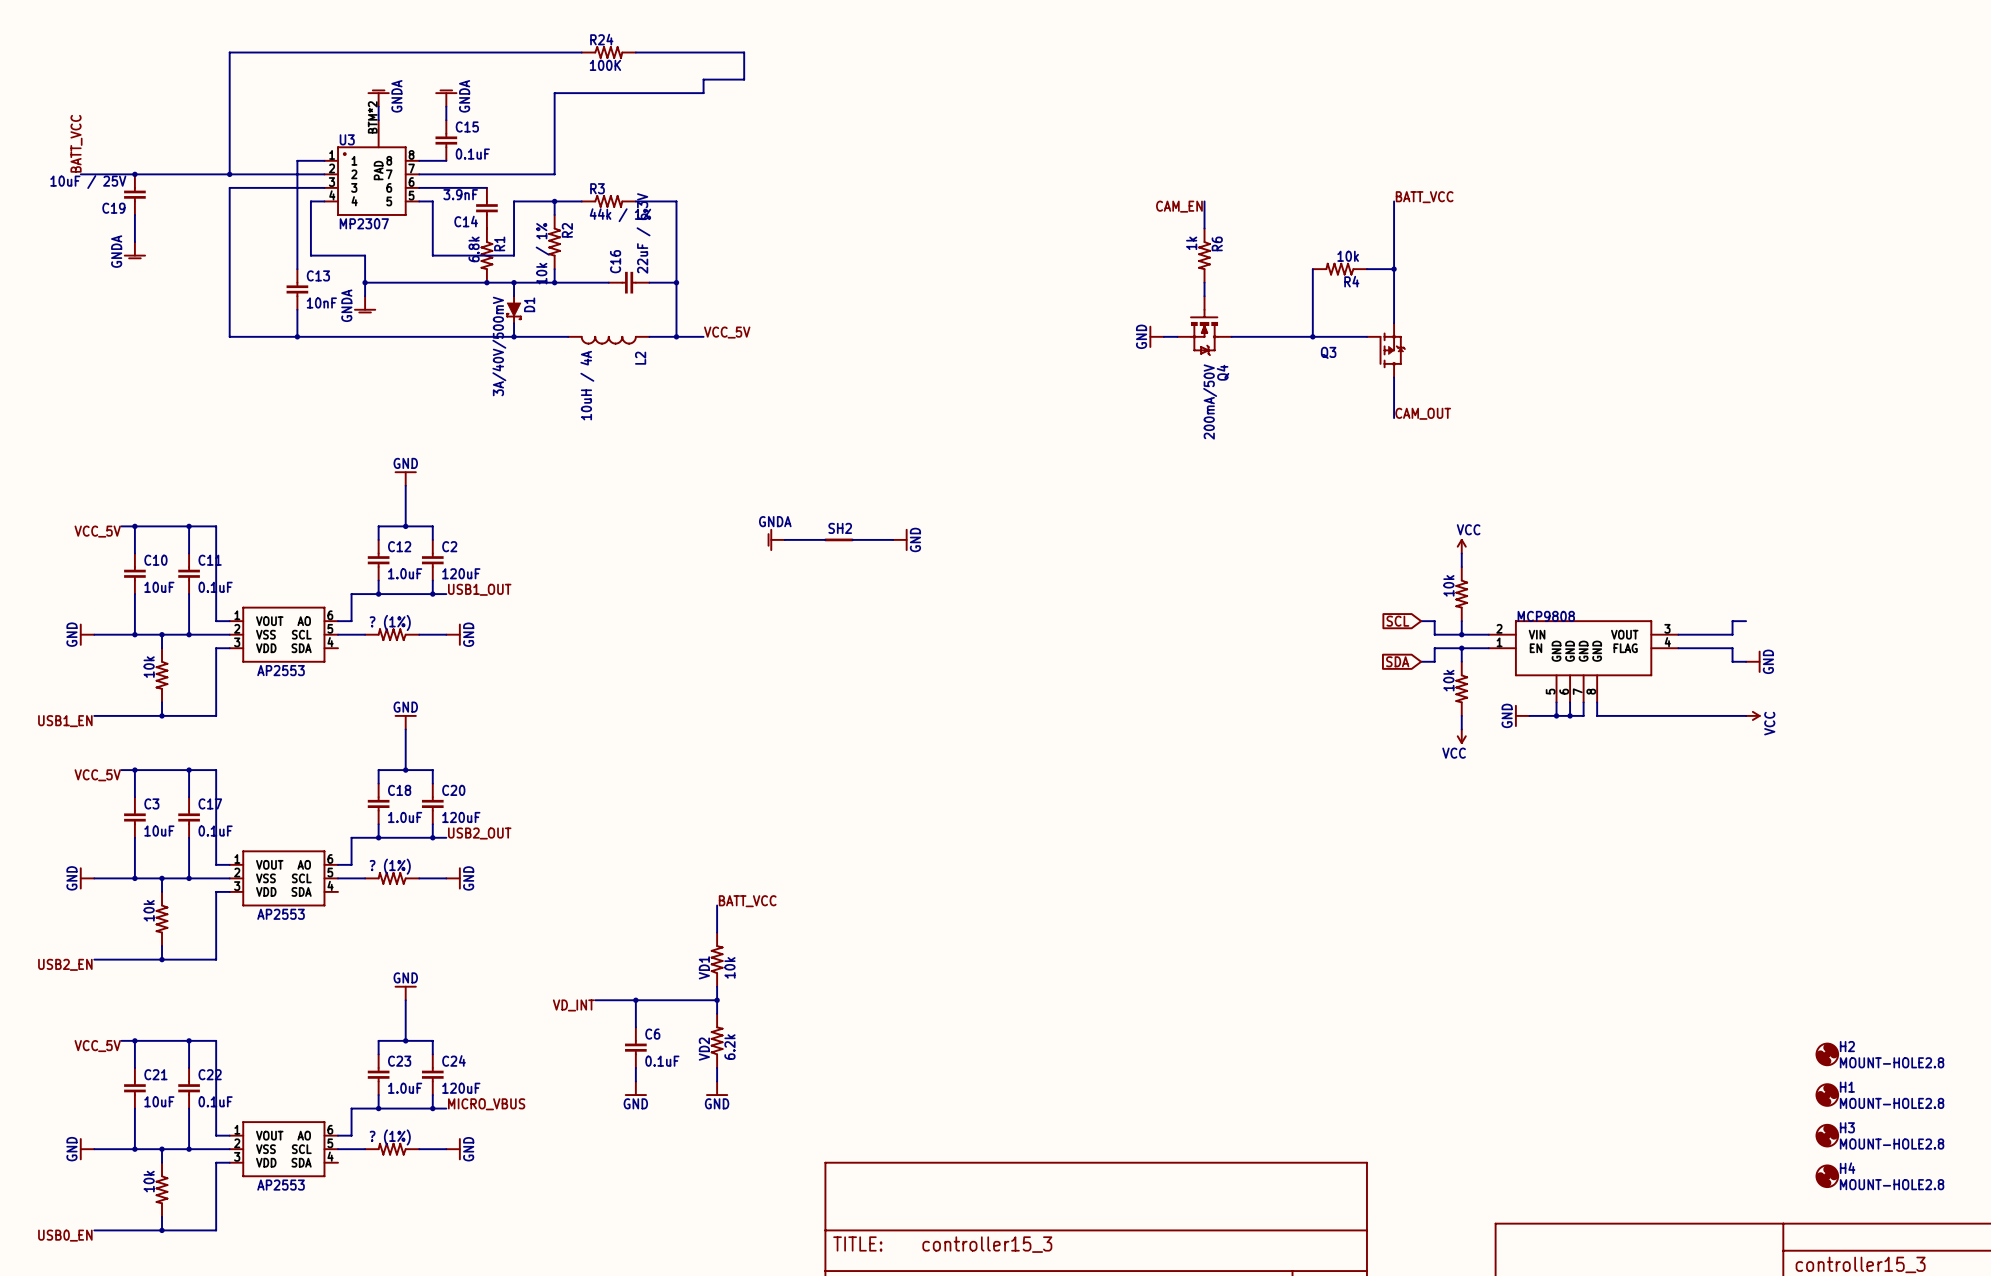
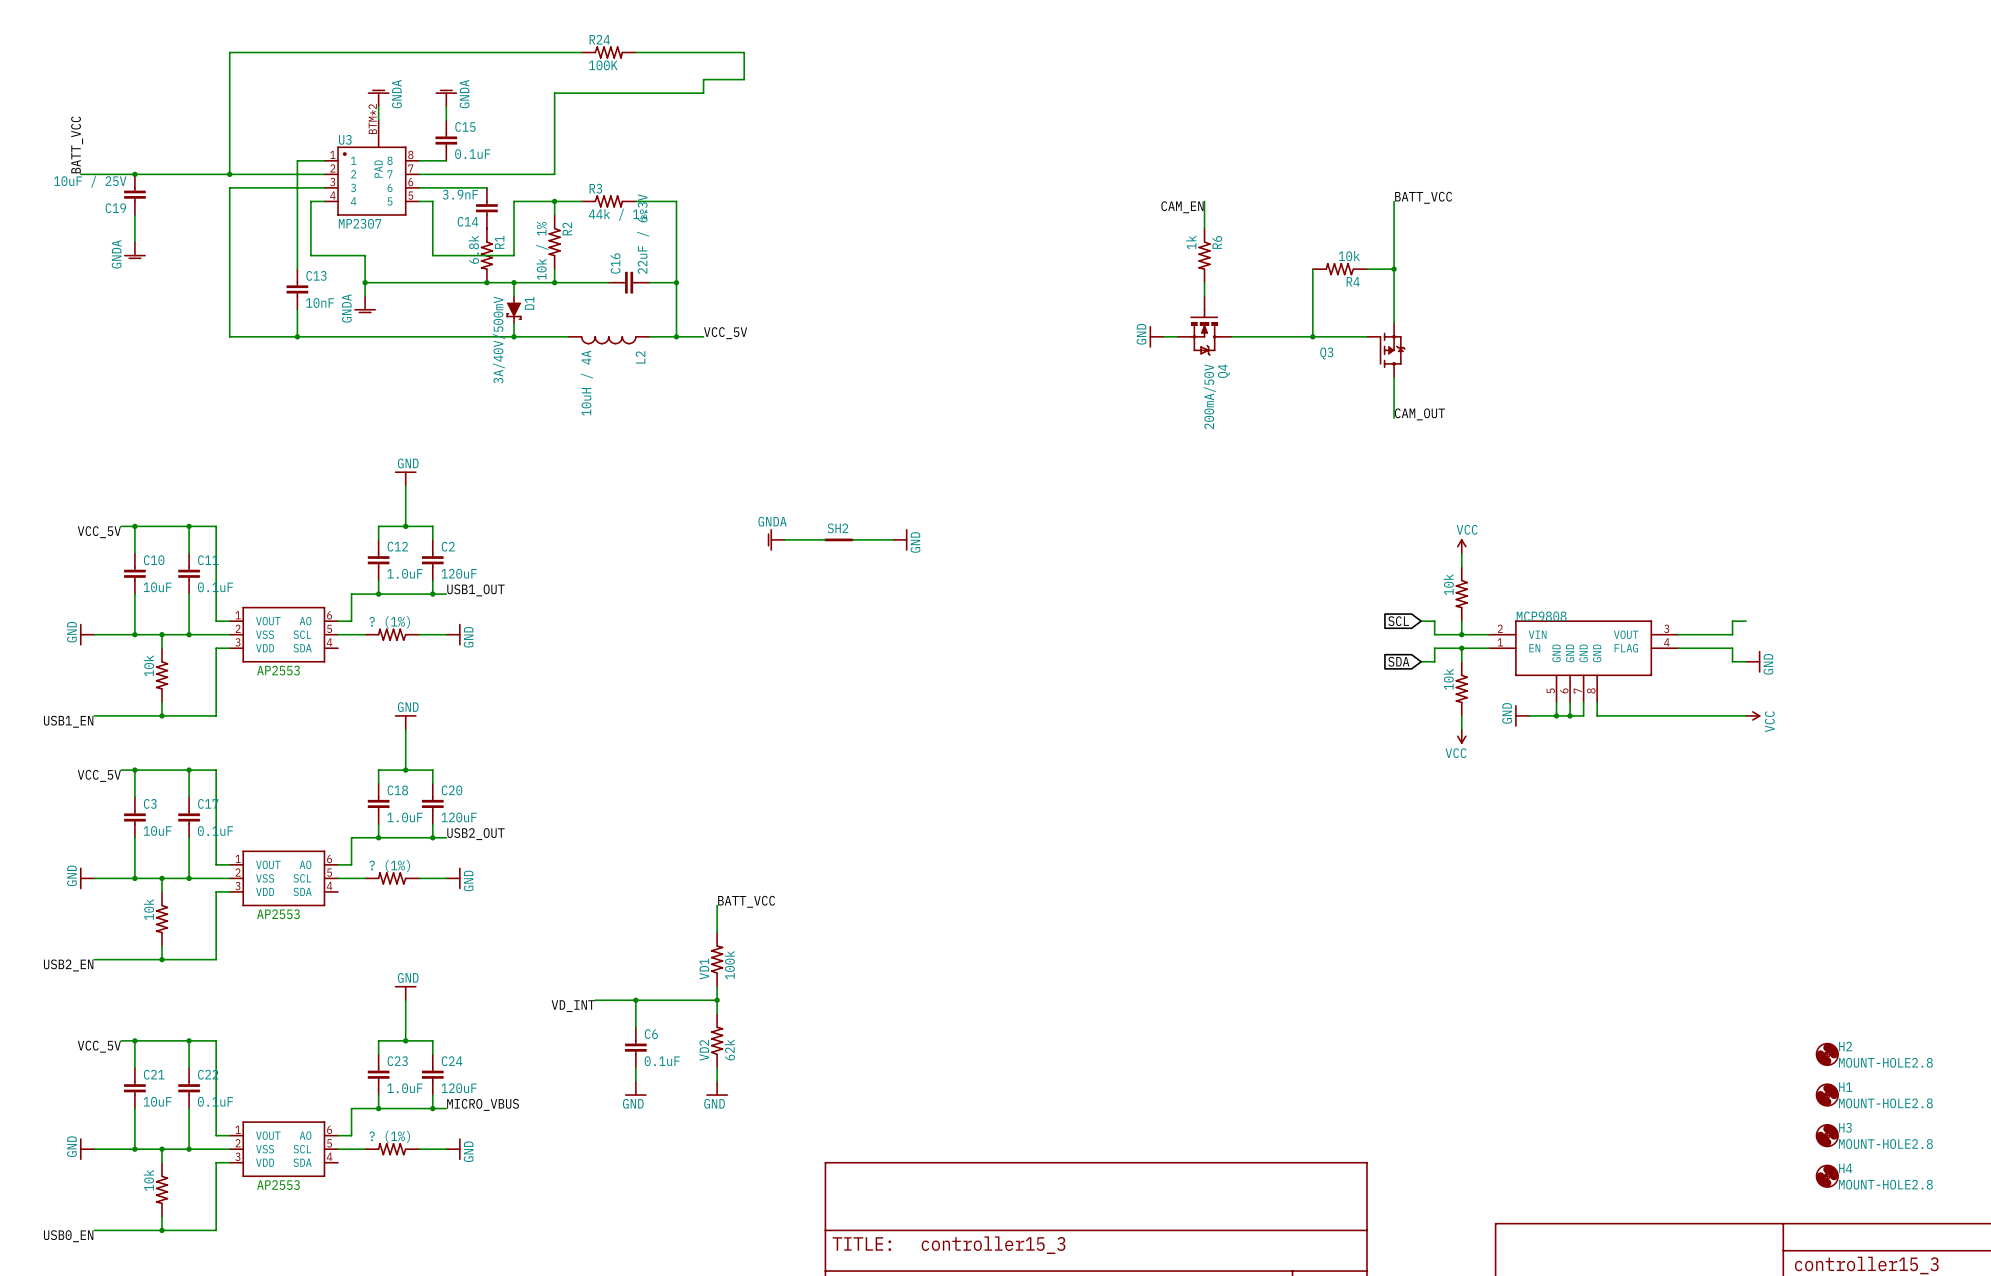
VD1 value: 10k (729, 967) -> 100k (729, 965)
VD2 value: 6.2k (729, 1047) -> 62k (729, 1049)

